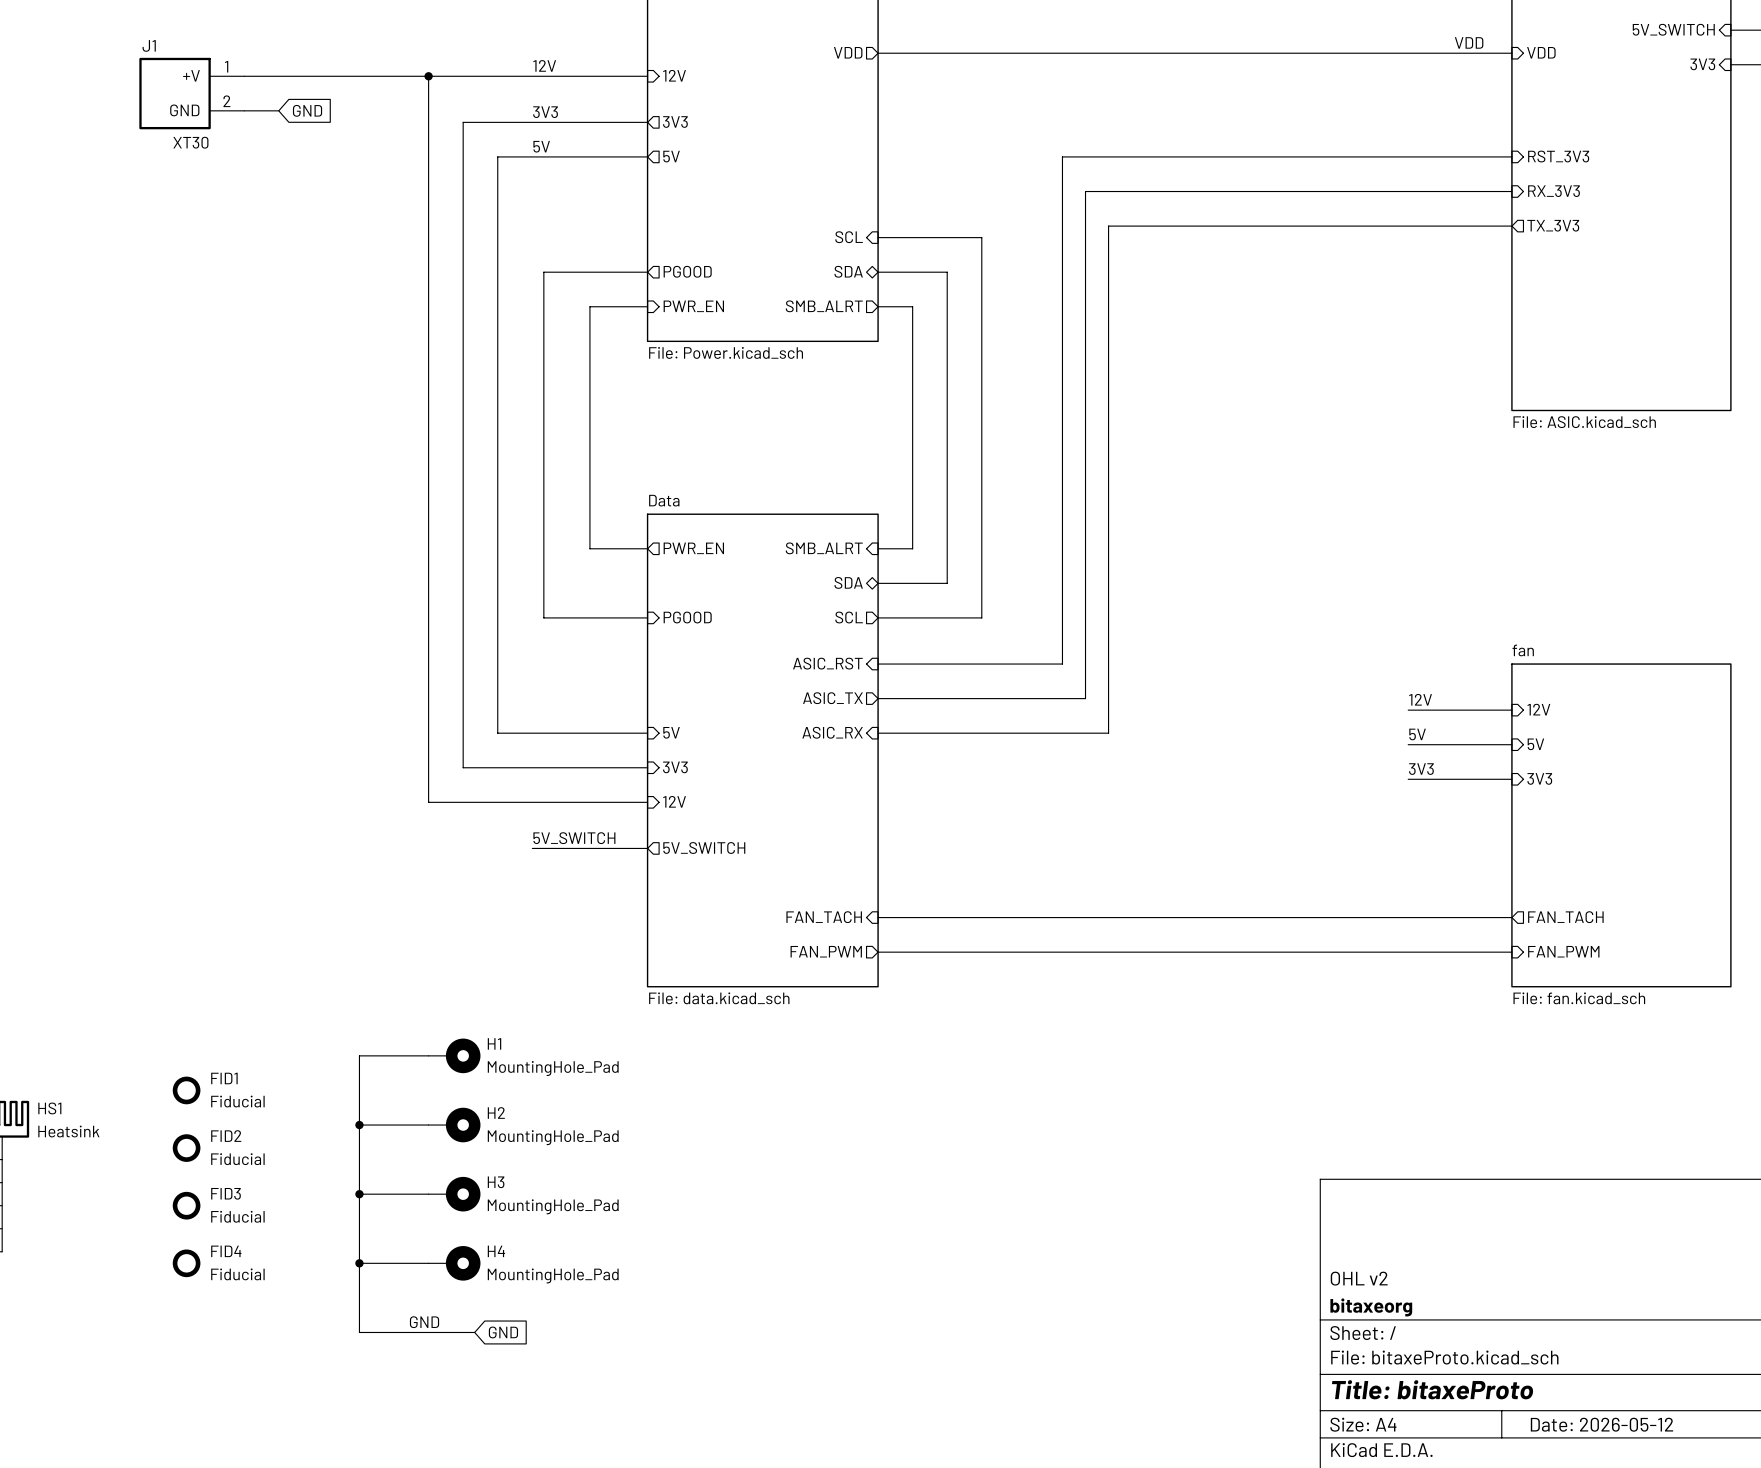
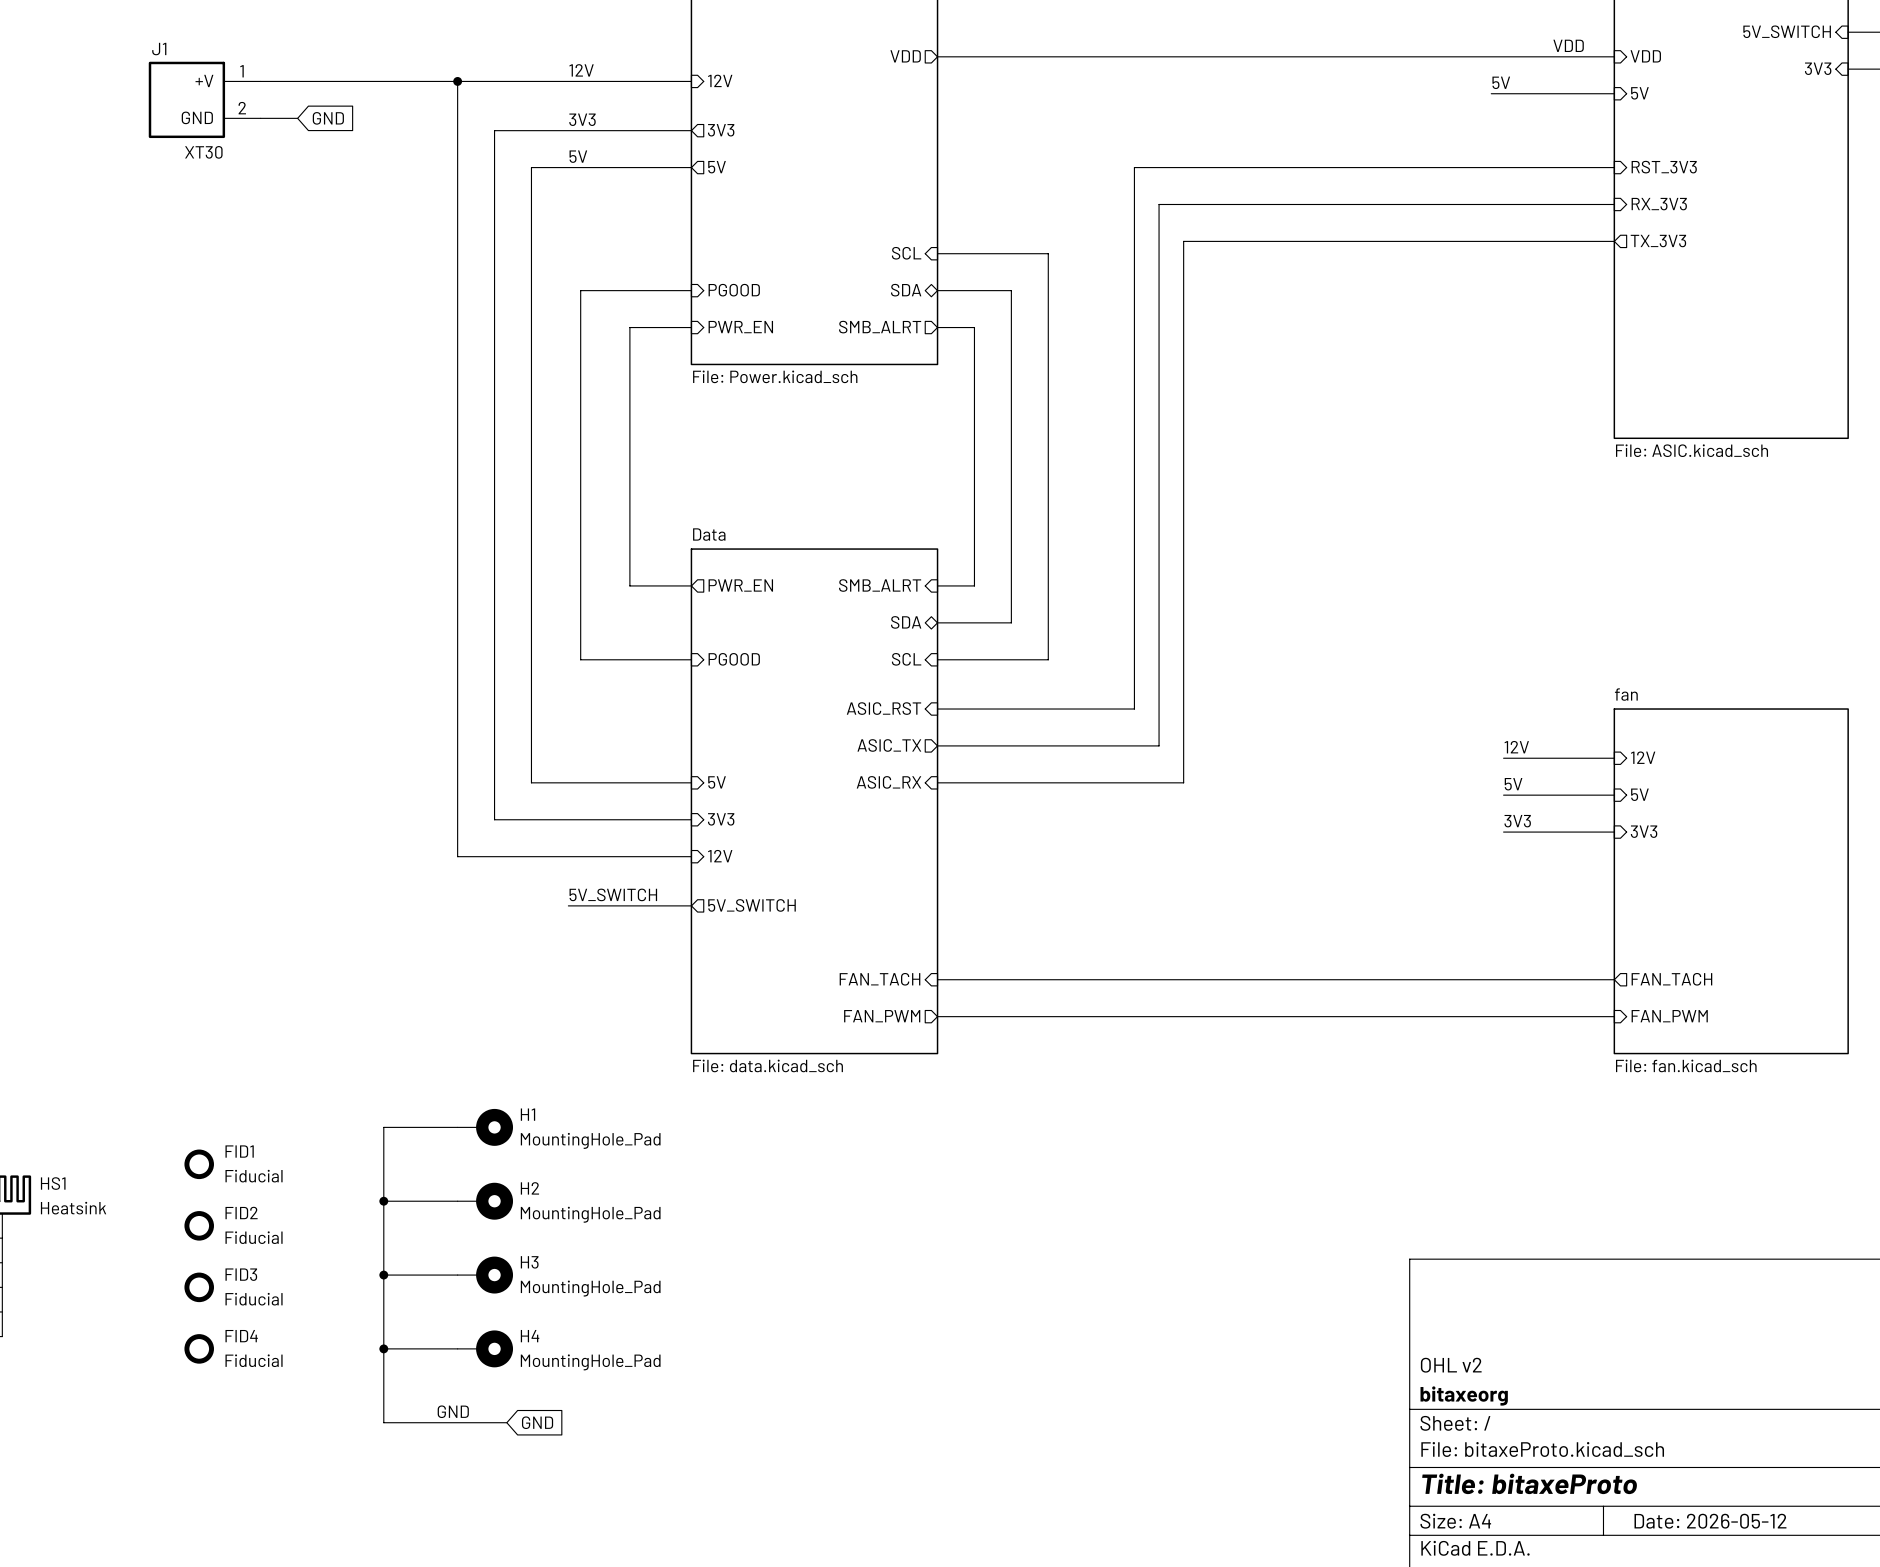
label: none -> 5V (1501, 82)
wire: none -> (1491, 93) (1614, 93)
sheet pin: none -> 5V (1639, 93)
sheet pin shape: output (687, 271) -> input (734, 290)
sheet pin shape: output (849, 617) -> input (906, 659)

